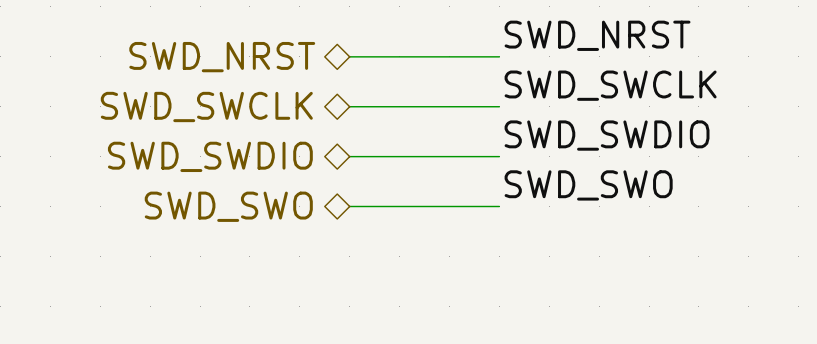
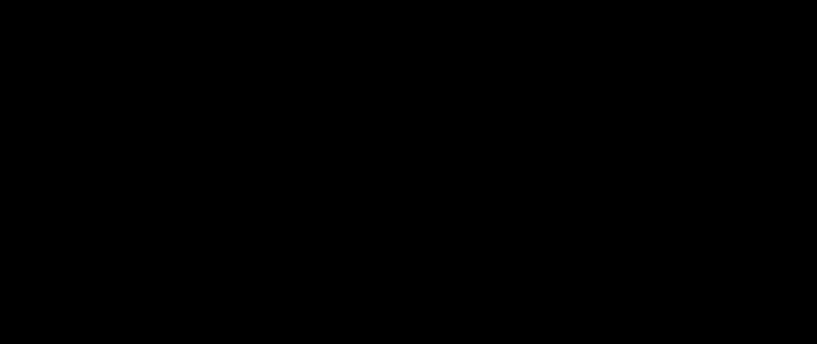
label: SWD_NRST (597, 35) -> none
wire: (349, 56) (499, 56) -> none
hierarchical label: SWD_NRST (222, 57) -> none
label: SWD_SWCLK (610, 85) -> none
hierarchical label: SWD_SWCLK (206, 106) -> none
wire: (349, 106) (499, 106) -> none
label: SWD_SWDIO (607, 135) -> none
hierarchical label: SWD_SWDIO (210, 156) -> none
wire: (349, 156) (499, 156) -> none
label: SWD_SWO (588, 185) -> none
hierarchical label: SWD_SWO (228, 206) -> none
wire: (349, 206) (499, 206) -> none

